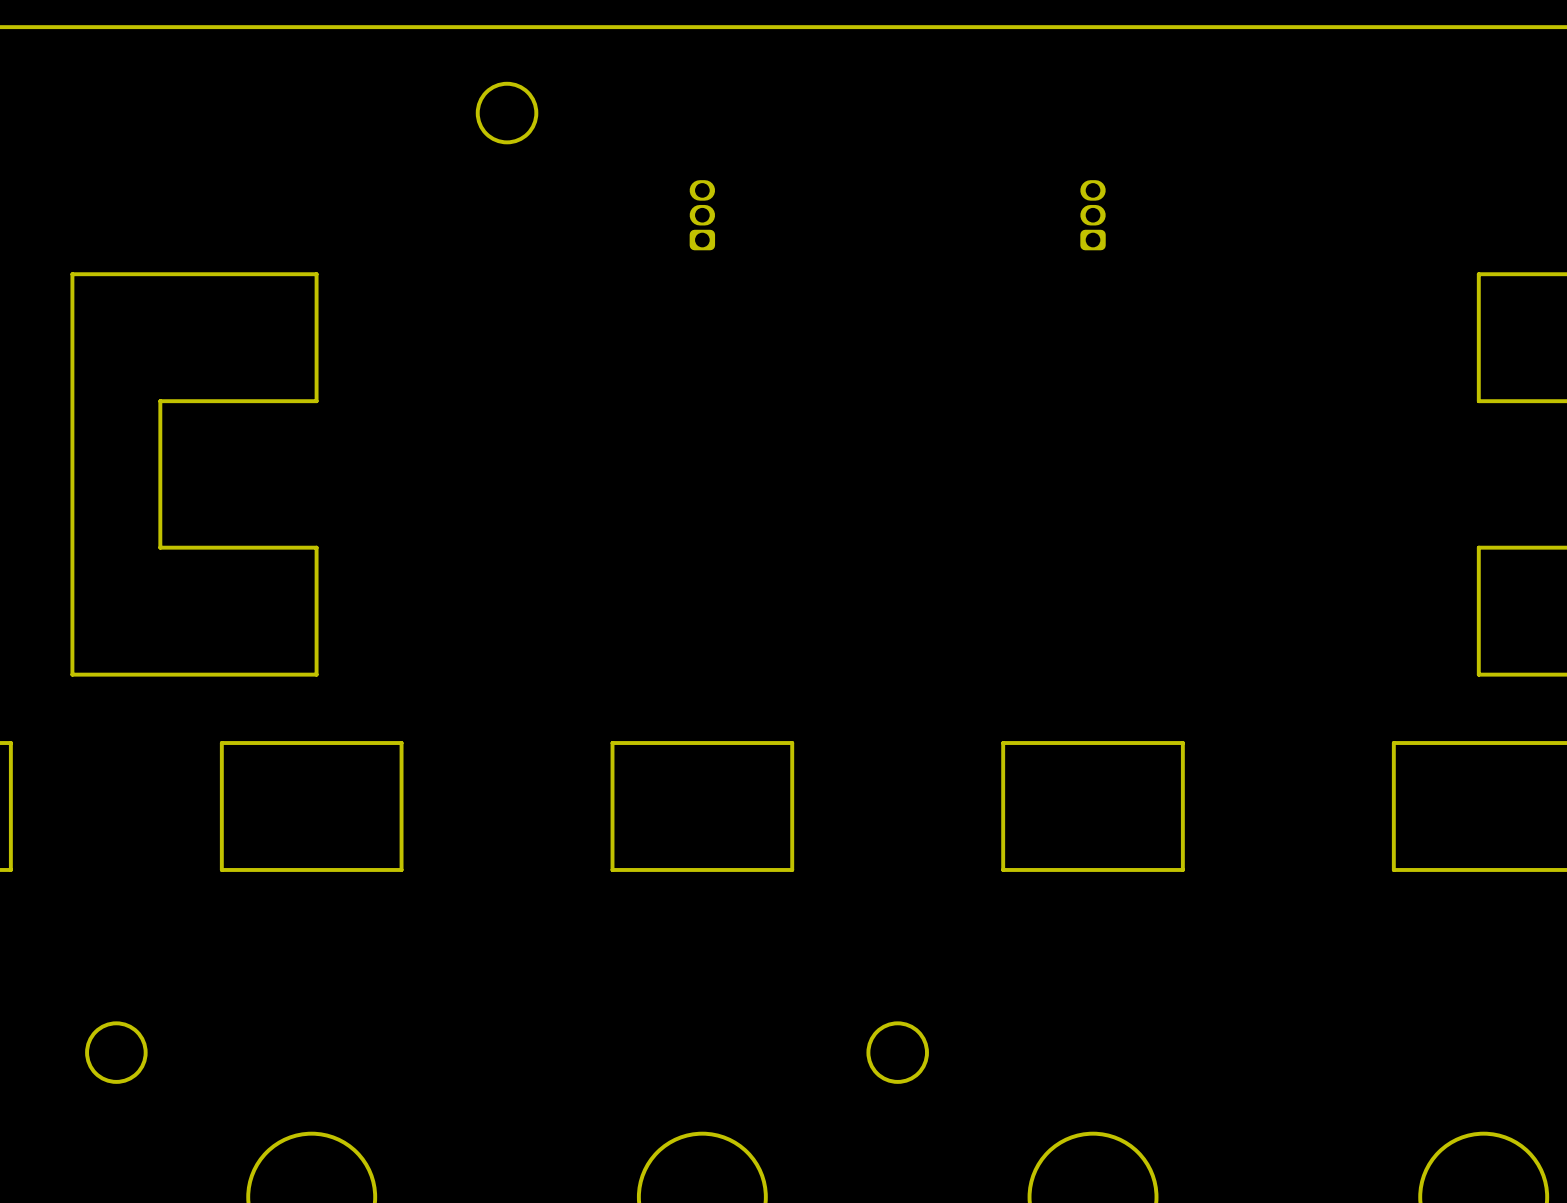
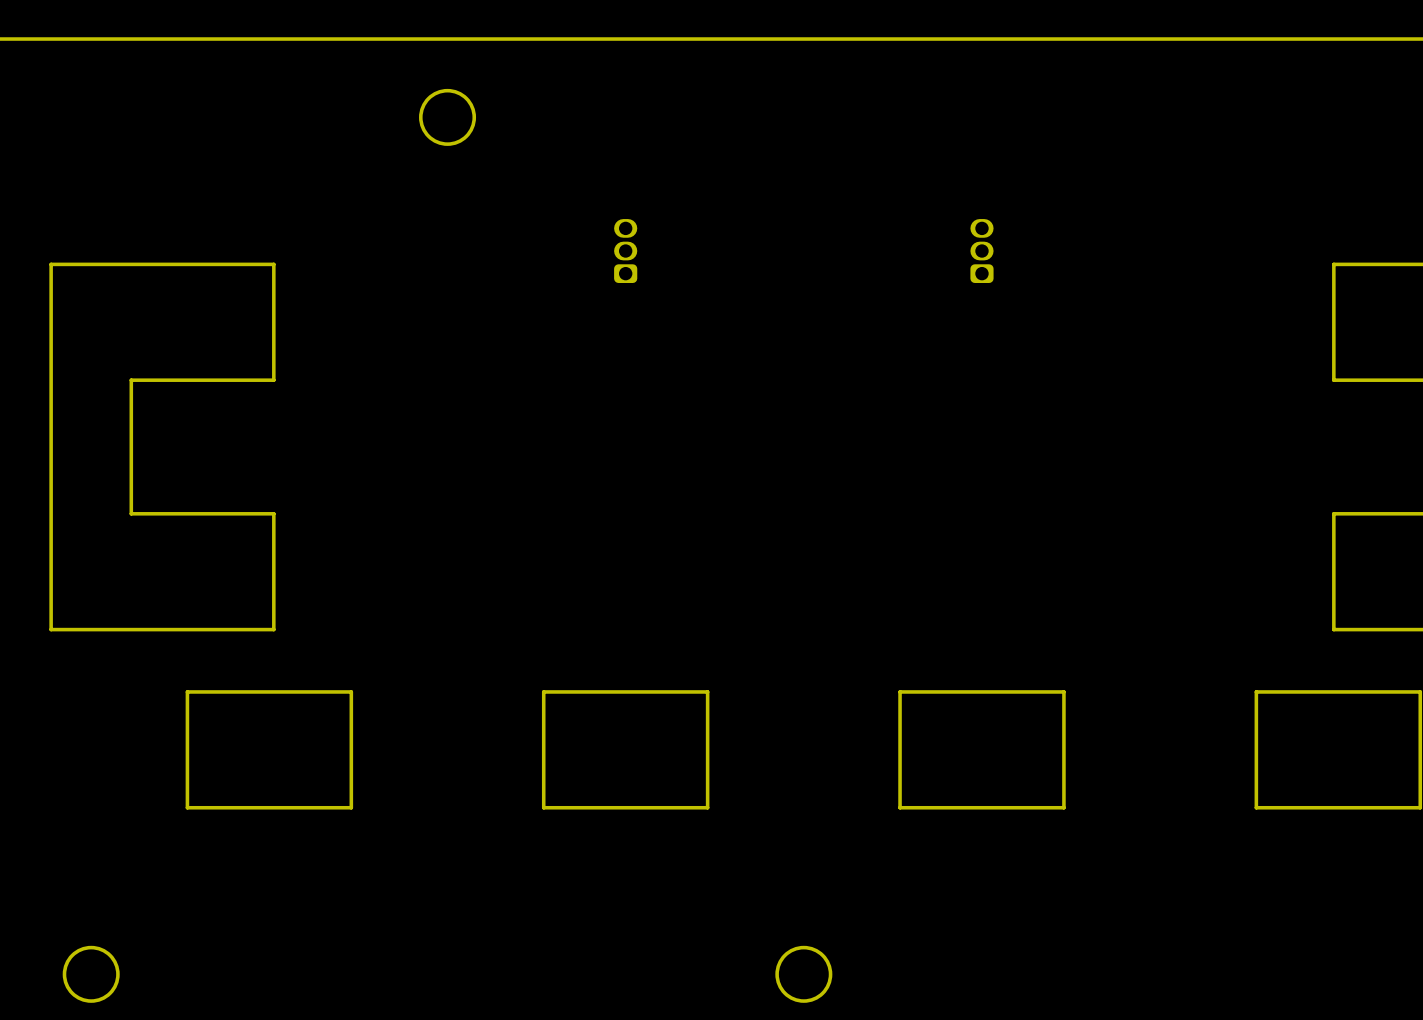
part position: (702, 215) -> (625, 251)
part position: (1093, 215) -> (981, 251)

